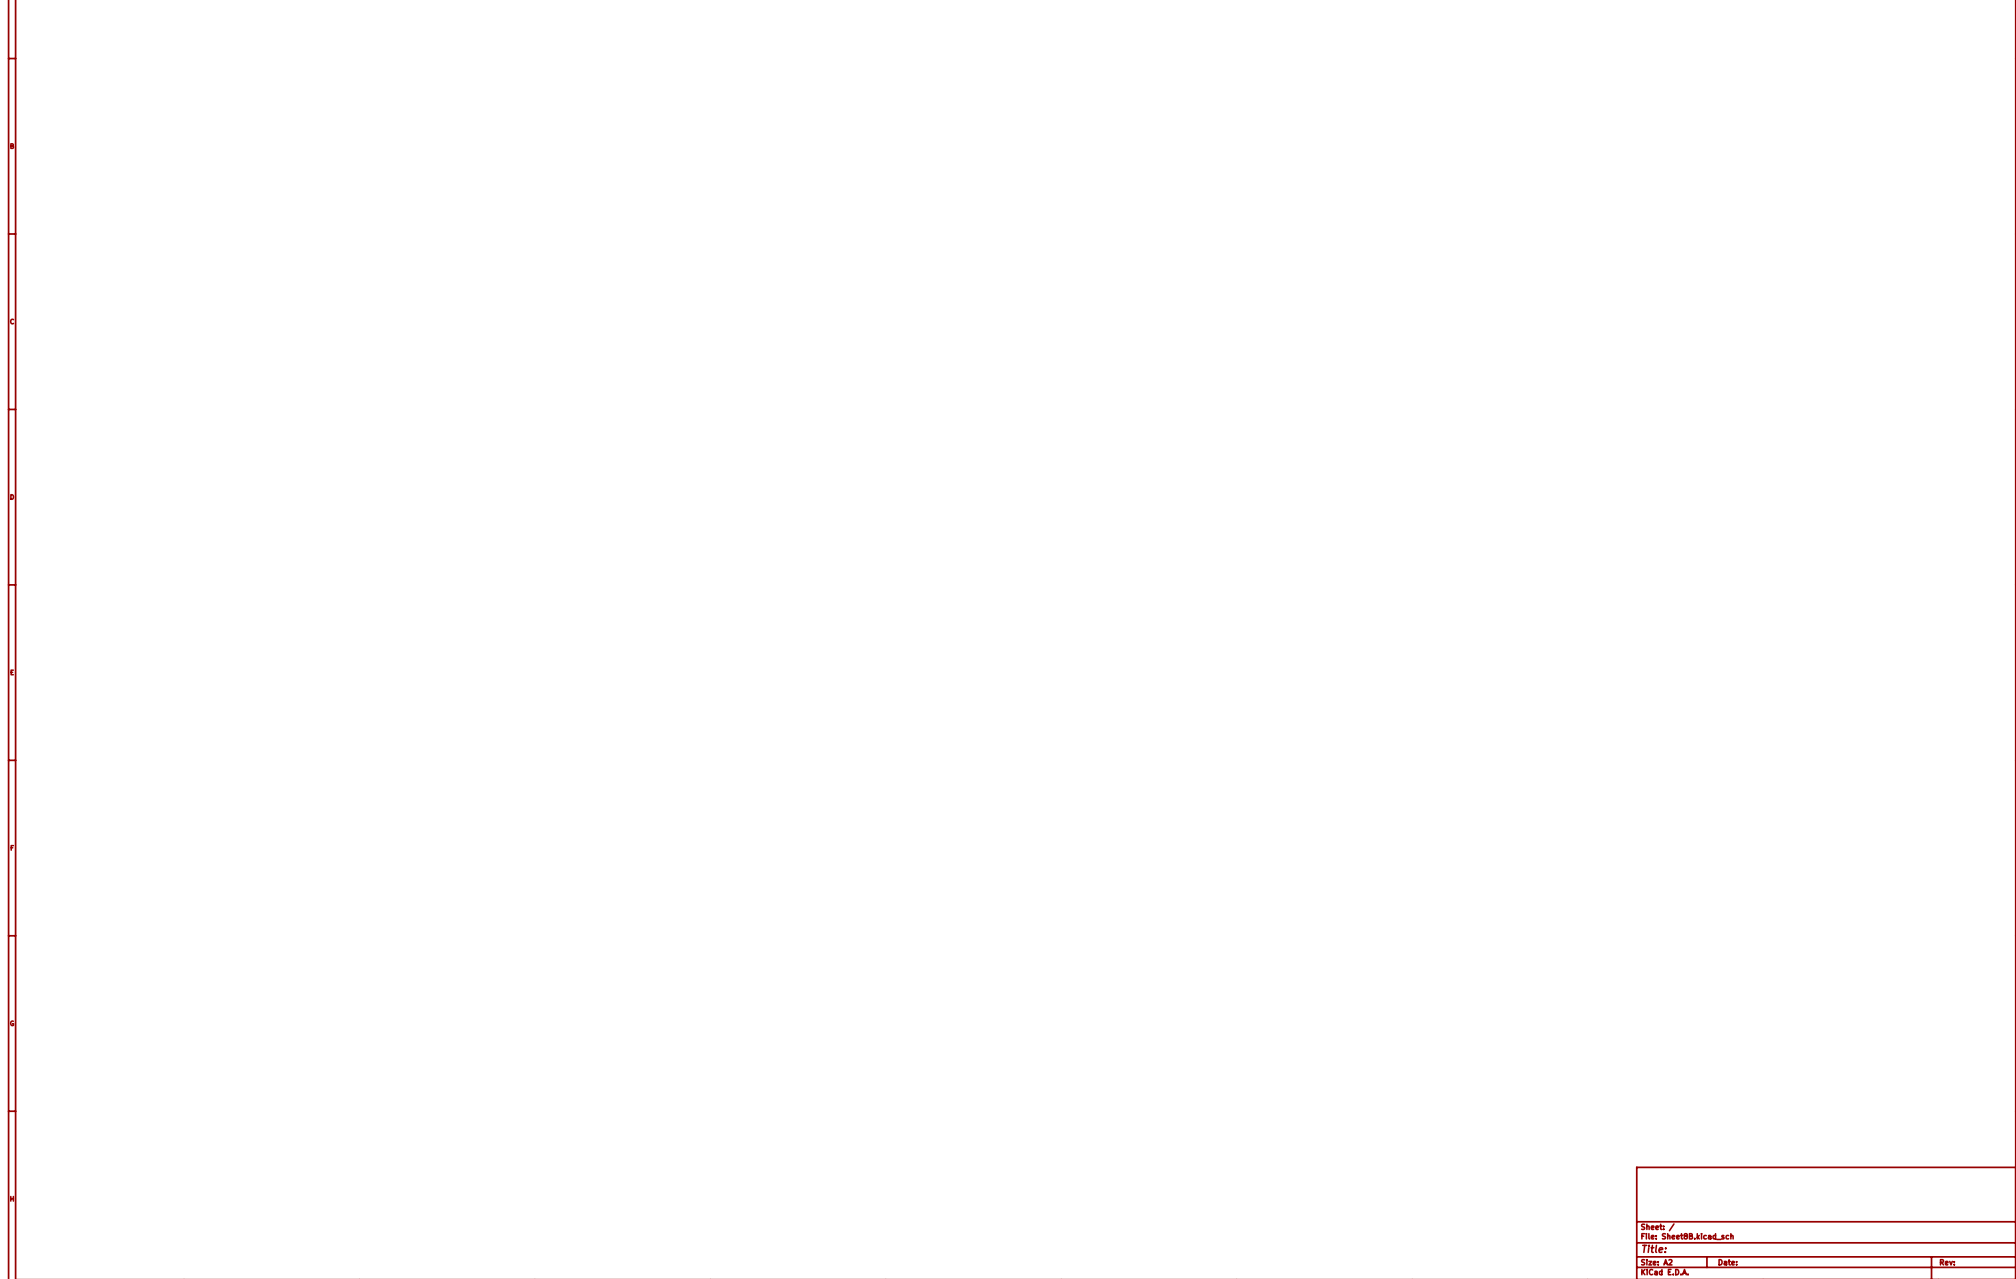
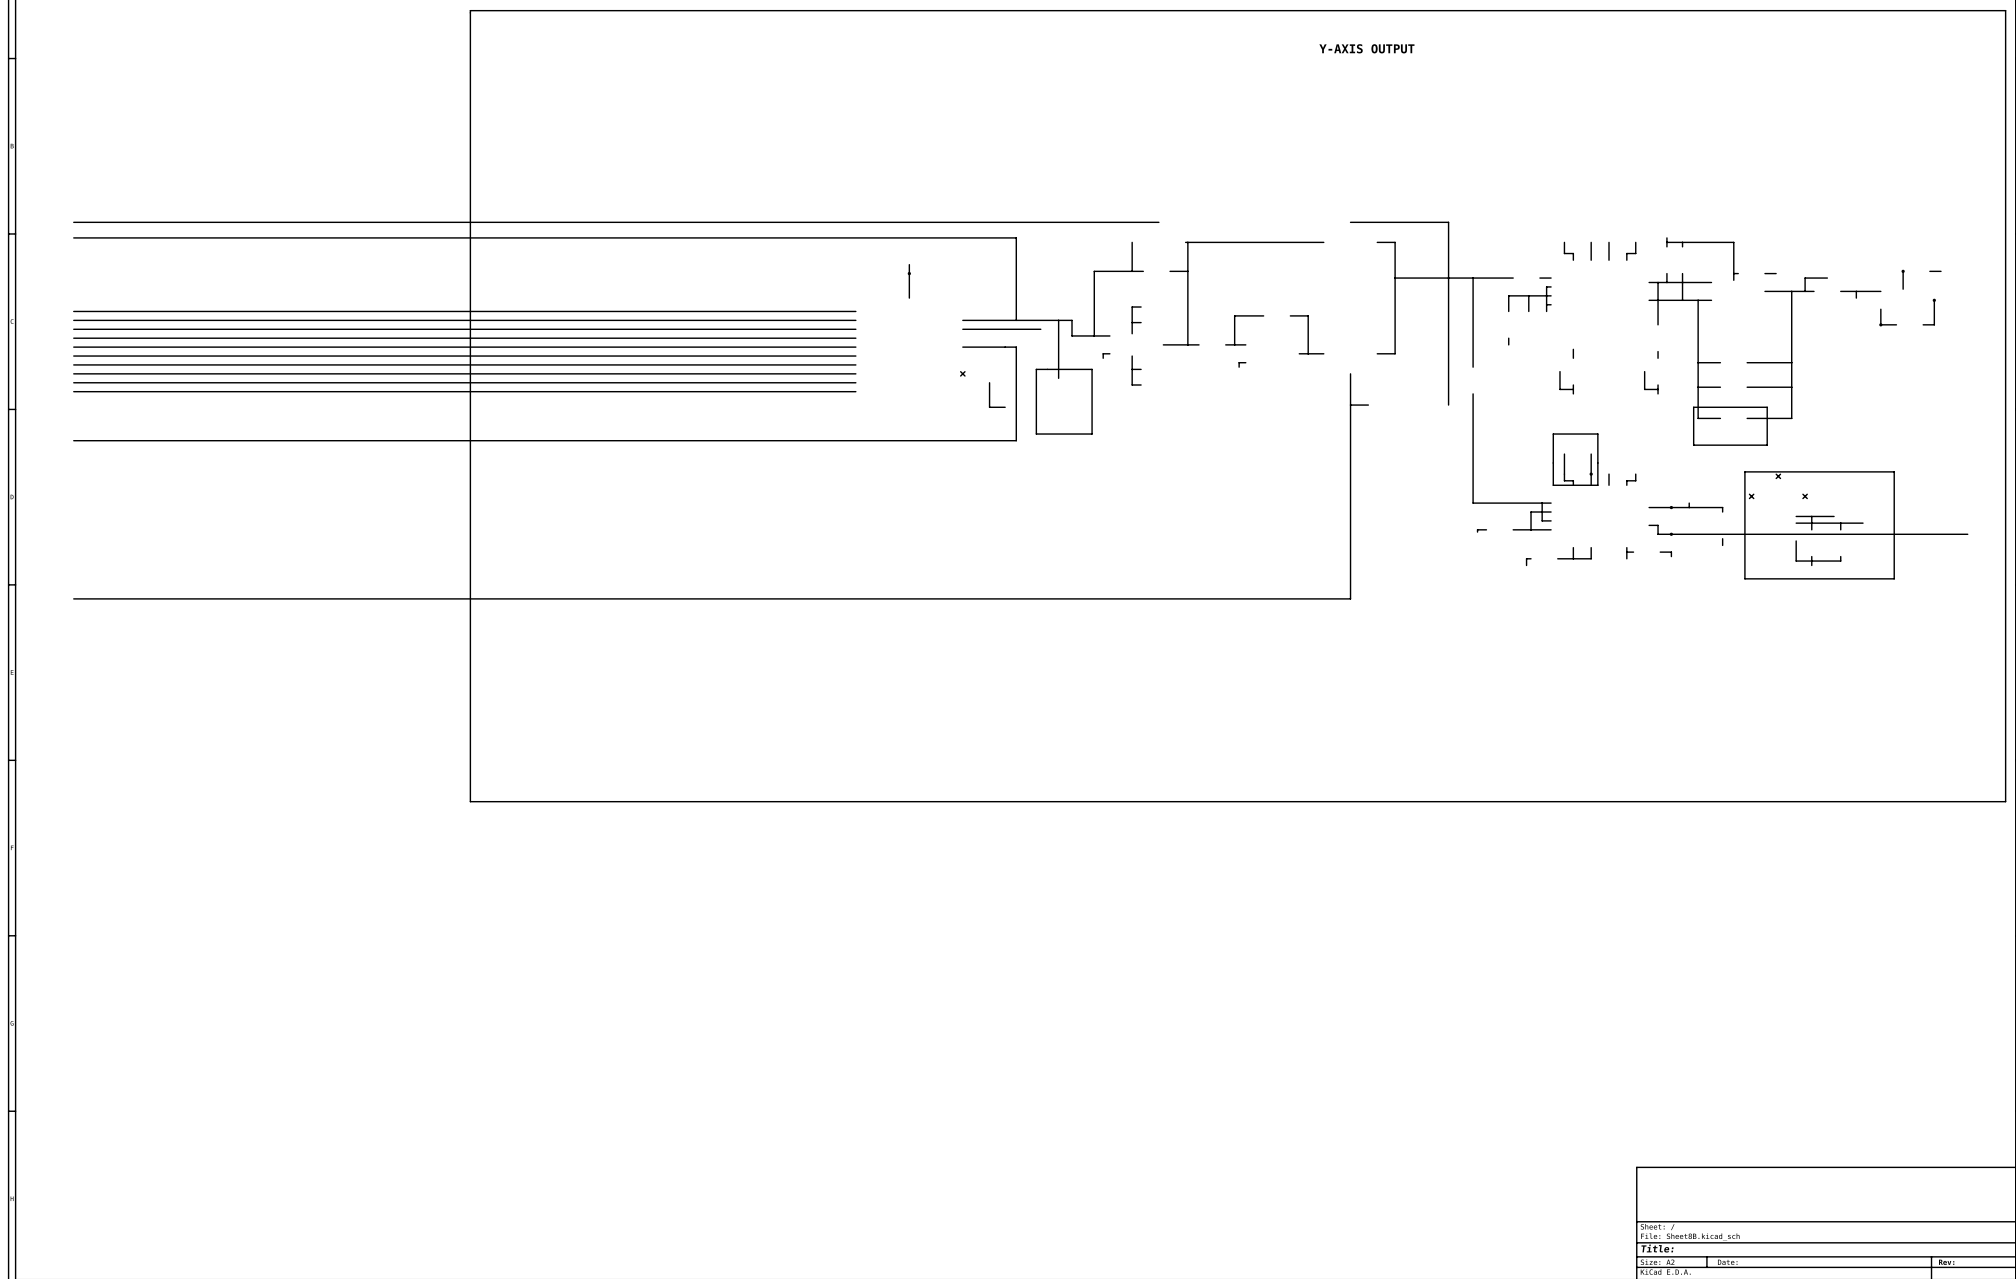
line: none -> (470, 10) (2005, 10) (2005, 801) (470, 801) (470, 10)
text: none -> Y-AXIS OUTPUT (1366, 48)
wire: none -> (73, 222) (1158, 222)
wire: none -> (1350, 222) (1448, 222) (1448, 405)
wire: none -> (73, 237) (1016, 237) (1016, 320)
wire: none -> (1666, 237) (1666, 246)
wire: none -> (1132, 242) (1132, 271)
wire: none -> (1185, 242) (1323, 242)
wire: none -> (1187, 242) (1187, 344)
wire: none -> (1377, 242) (1395, 242) (1395, 353) (1377, 353)
wire: none -> (1564, 242) (1564, 253) (1573, 253) (1573, 260)
wire: none -> (1591, 242) (1591, 260)
wire: none -> (1609, 242) (1609, 260)
wire: none -> (1635, 242) (1635, 253) (1626, 253) (1626, 260)
wire: none -> (1666, 242) (1733, 242) (1733, 280)
wire: none -> (1682, 242) (1682, 246)
wire: none -> (909, 264) (909, 298)
wire: none -> (1143, 271) (1094, 271) (1094, 335)
wire: none -> (1170, 271) (1187, 271)
wire: none -> (1903, 271) (1903, 289)
junction: none -> (1903, 271)
wire: none -> (1929, 271) (1941, 271)
junction: none -> (909, 273)
wire: none -> (1666, 273) (1666, 282)
wire: none -> (1682, 273) (1682, 300)
wire: none -> (1733, 273) (1738, 273)
wire: none -> (1764, 273) (1776, 273)
wire: none -> (1395, 278) (1513, 278)
wire: none -> (1473, 278) (1473, 367)
wire: none -> (1539, 278) (1551, 278)
wire: none -> (1827, 278) (1805, 278) (1805, 291)
wire: none -> (1649, 282) (1711, 282)
wire: none -> (1658, 282) (1658, 324)
wire: none -> (1551, 286) (1546, 286) (1546, 311)
wire: none -> (1764, 291) (1814, 291)
wire: none -> (1791, 291) (1791, 418) (1747, 418)
wire: none -> (1840, 291) (1880, 291)
wire: none -> (1856, 291) (1856, 298)
wire: none -> (1528, 295) (1528, 311)
wire: none -> (1551, 295) (1508, 295) (1508, 311)
wire: none -> (1649, 300) (1711, 300)
wire: none -> (1698, 300) (1698, 418) (1720, 418)
wire: none -> (1934, 300) (1934, 324) (1923, 324)
junction: none -> (1934, 300)
wire: none -> (1546, 304) (1551, 304)
wire: none -> (1141, 307) (1132, 307) (1132, 333)
wire: none -> (1880, 309) (1880, 324) (1896, 324)
wire: none -> (73, 311) (855, 311)
wire: none -> (1263, 315) (1234, 315) (1234, 344)
wire: none -> (1290, 315) (1308, 315) (1308, 353)
wire: none -> (73, 320) (855, 320)
wire: none -> (962, 320) (1072, 320) (1072, 335) (1109, 335)
wire: none -> (1058, 320) (1058, 378)
wire: none -> (1132, 322) (1141, 322)
junction: none -> (1880, 324)
wire: none -> (73, 329) (855, 329)
wire: none -> (962, 329) (1040, 329)
wire: none -> (73, 338) (855, 338)
wire: none -> (1508, 338) (1508, 344)
wire: none -> (1163, 344) (1199, 344)
wire: none -> (1225, 344) (1245, 344)
wire: none -> (73, 347) (855, 347)
wire: none -> (962, 347) (1016, 347) (1016, 440) (73, 440)
wire: none -> (1573, 349) (1573, 358)
wire: none -> (1658, 351) (1658, 358)
wire: none -> (1109, 353) (1103, 353) (1103, 358)
wire: none -> (1299, 353) (1323, 353)
wire: none -> (73, 356) (855, 356)
wire: none -> (1132, 356) (1132, 384) (1141, 384)
wire: none -> (1245, 362) (1239, 362) (1239, 367)
wire: none -> (1698, 362) (1720, 362)
wire: none -> (1747, 362) (1791, 362)
wire: none -> (73, 364) (855, 364)
line: none -> (1036, 369) (1092, 369) (1092, 434) (1036, 434) (1036, 369)
wire: none -> (1132, 369) (1141, 369)
wire: none -> (1559, 371) (1559, 389) (1573, 389)
wire: none -> (1644, 371) (1644, 389) (1658, 389)
wire: none -> (73, 373) (855, 373)
no-connect mark: none -> (962, 373)
wire: none -> (1350, 373) (1350, 598) (73, 598)
wire: none -> (73, 382) (855, 382)
wire: none -> (989, 382) (989, 407) (1005, 407)
wire: none -> (1573, 384) (1573, 393)
wire: none -> (1658, 384) (1658, 393)
wire: none -> (1698, 387) (1720, 387)
wire: none -> (1747, 387) (1791, 387)
wire: none -> (73, 391) (855, 391)
wire: none -> (1473, 393) (1473, 503) (1551, 503)
wire: none -> (1350, 405) (1368, 405)
line: none -> (1693, 407) (1693, 445) (1767, 445) (1767, 407) (1693, 407)
line: none -> (1553, 434) (1553, 485) (1597, 485) (1597, 434) (1553, 434)
wire: none -> (1564, 454) (1564, 480) (1573, 480) (1573, 485)
wire: none -> (1591, 454) (1591, 485)
line: none -> (1744, 471) (1894, 471) (1894, 578) (1744, 578) (1744, 471)
junction: none -> (1591, 474)
wire: none -> (1609, 474) (1609, 485)
wire: none -> (1635, 474) (1635, 480) (1626, 480) (1626, 485)
no-connect mark: none -> (1778, 476)
no-connect mark: none -> (1751, 496)
no-connect mark: none -> (1805, 496)
wire: none -> (1542, 503) (1542, 520) (1551, 520)
wire: none -> (1689, 503) (1689, 507)
wire: none -> (1649, 507) (1722, 507) (1722, 512)
junction: none -> (1671, 507)
wire: none -> (1551, 512) (1531, 512) (1531, 529)
wire: none -> (1796, 516) (1834, 516)
wire: none -> (1811, 516) (1811, 529)
wire: none -> (1796, 523) (1863, 523)
wire: none -> (1840, 523) (1840, 529)
wire: none -> (1649, 525) (1658, 525) (1658, 534) (1967, 534)
wire: none -> (1486, 529) (1477, 529) (1477, 532)
wire: none -> (1513, 529) (1551, 529)
junction: none -> (1671, 534)
wire: none -> (1722, 538) (1722, 545)
wire: none -> (1796, 540) (1796, 561) (1840, 561) (1840, 556)
wire: none -> (1573, 547) (1573, 558)
wire: none -> (1591, 547) (1591, 558) (1557, 558)
wire: none -> (1626, 547) (1626, 558)
wire: none -> (1626, 552) (1633, 552)
wire: none -> (1660, 552) (1671, 552) (1671, 556)
wire: none -> (1811, 556) (1811, 565)
wire: none -> (1531, 558) (1526, 558) (1526, 565)

